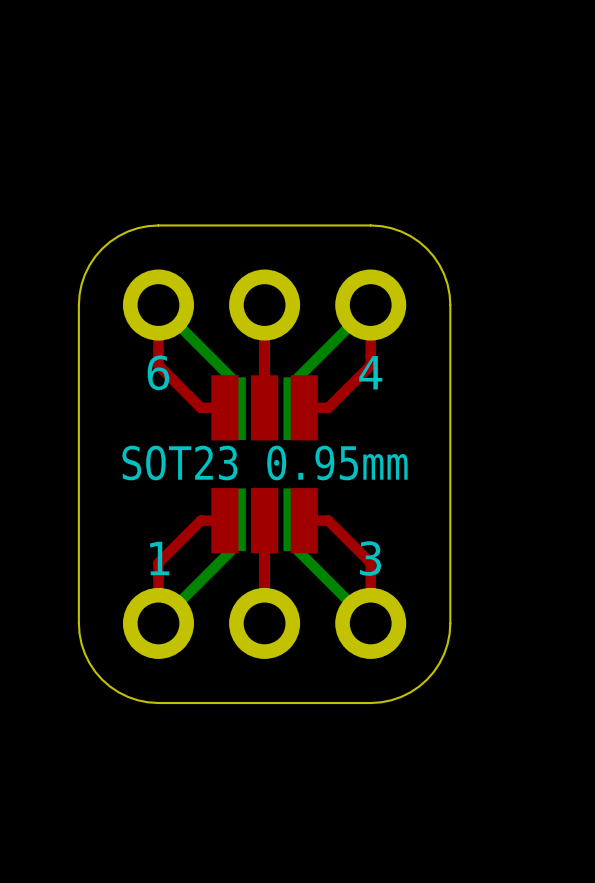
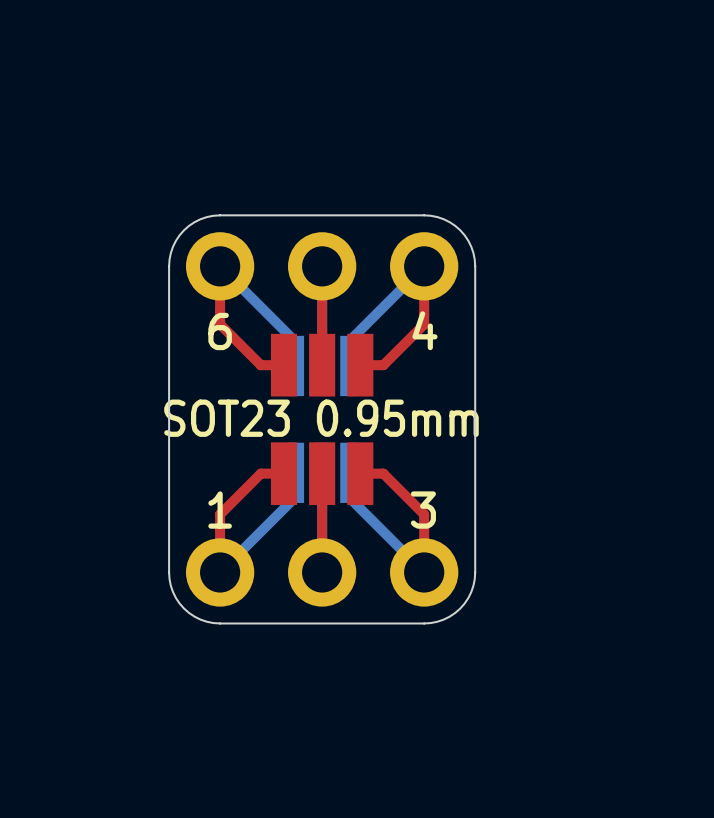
board edge: (158, 225) (381, 226) (410, 236) (427, 248) (439, 265) (447, 284) (450, 305) (449, 633) (439, 663) (427, 679) (410, 692) (391, 700) (370, 703) (148, 702) (118, 692) (102, 679) (89, 663) (81, 644) (78, 623) (79, 294) (89, 265) (110, 241) (137, 228) (158, 225) -> (220, 215) (206, 217) (189, 225) (175, 240) (169, 259) (169, 572) (170, 585) (175, 597) (184, 608) (194, 616) (213, 623) (424, 623) (437, 621) (449, 616) (460, 608) (468, 597) (473, 585) (475, 572) (475, 266) (473, 253) (468, 240) (460, 230) (449, 222) (430, 215) (220, 215)

